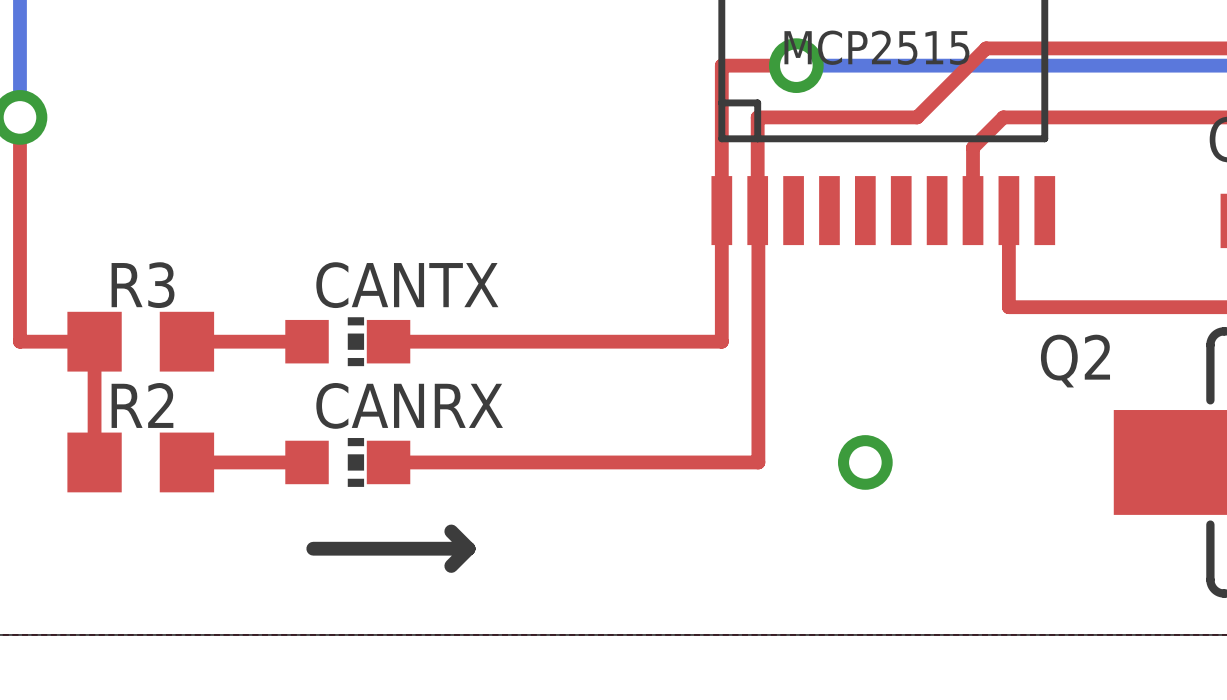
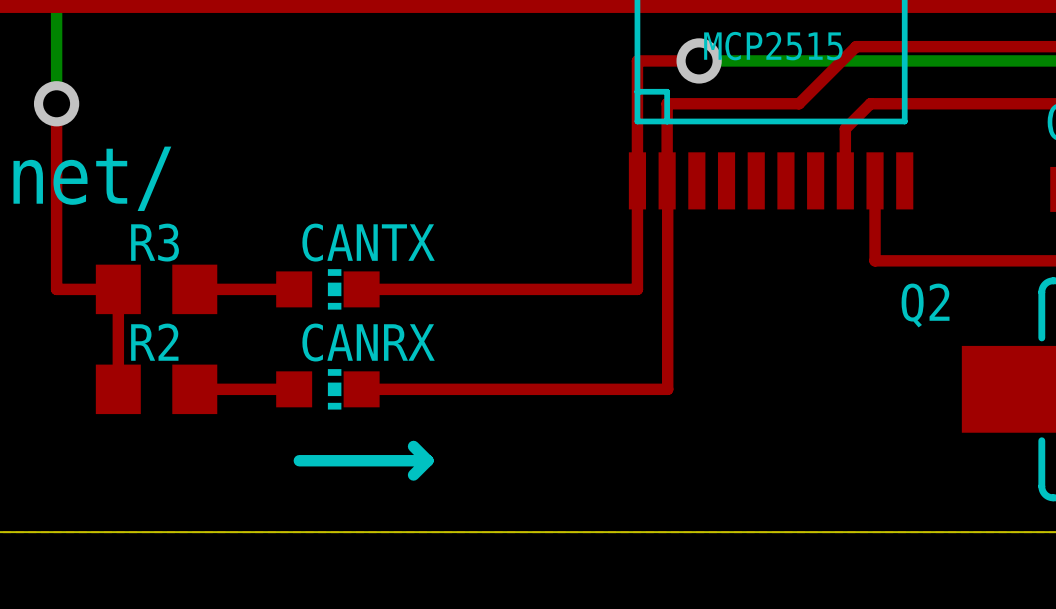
via: (865, 462) -> none

